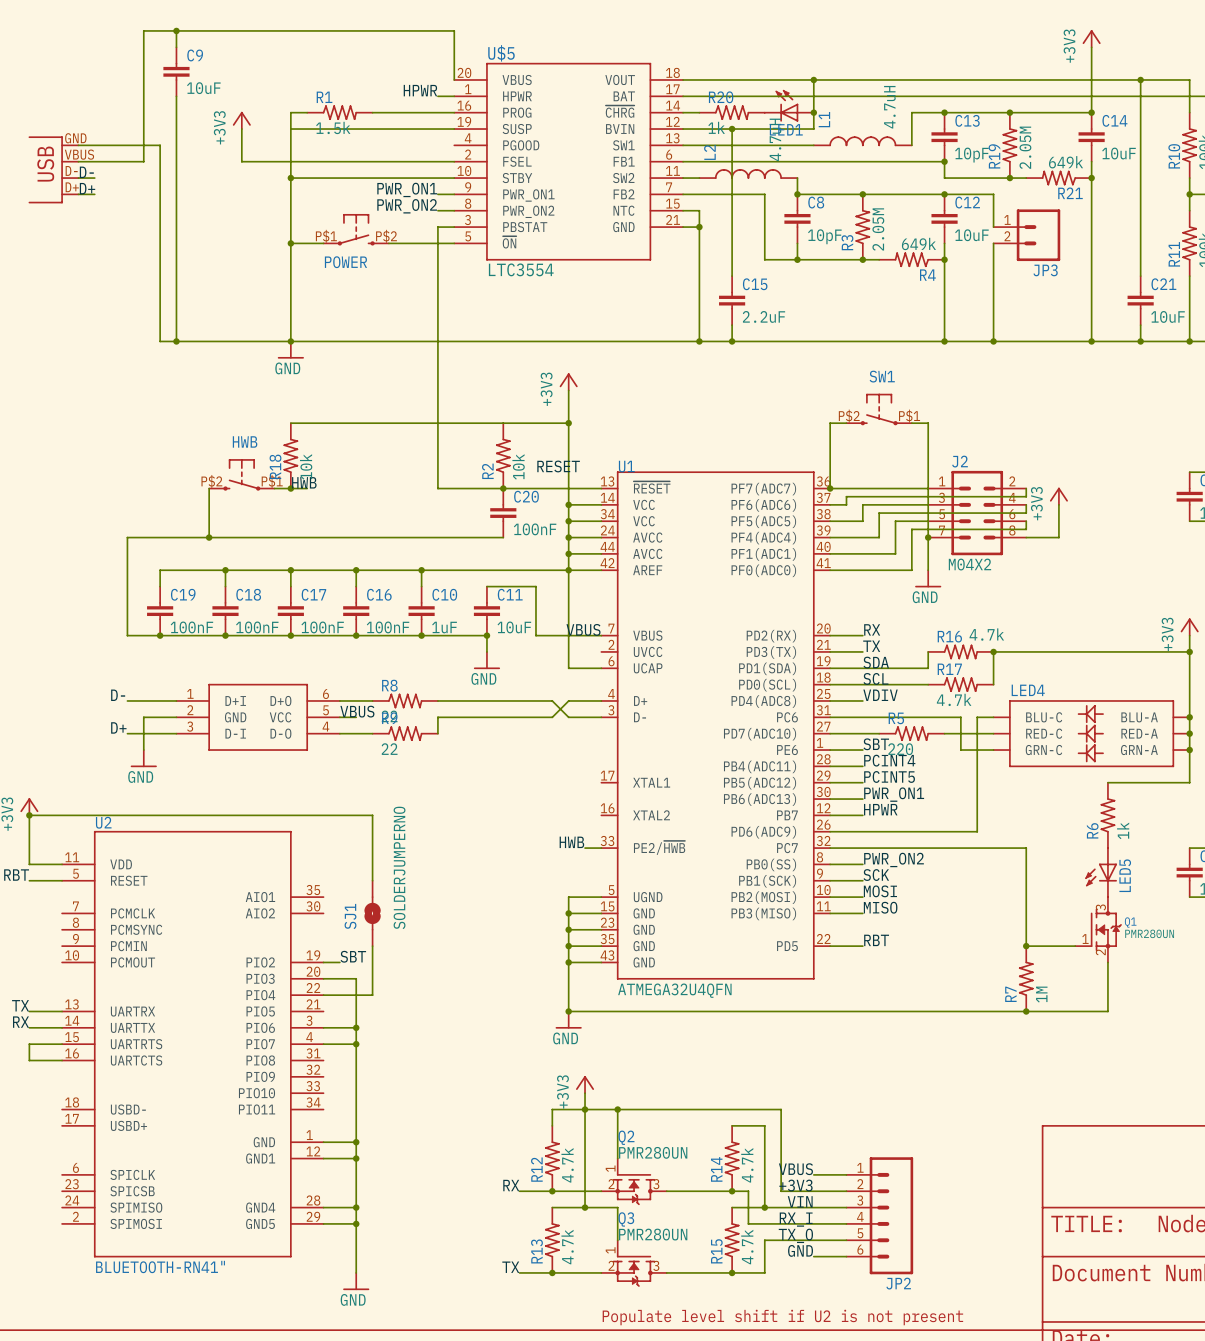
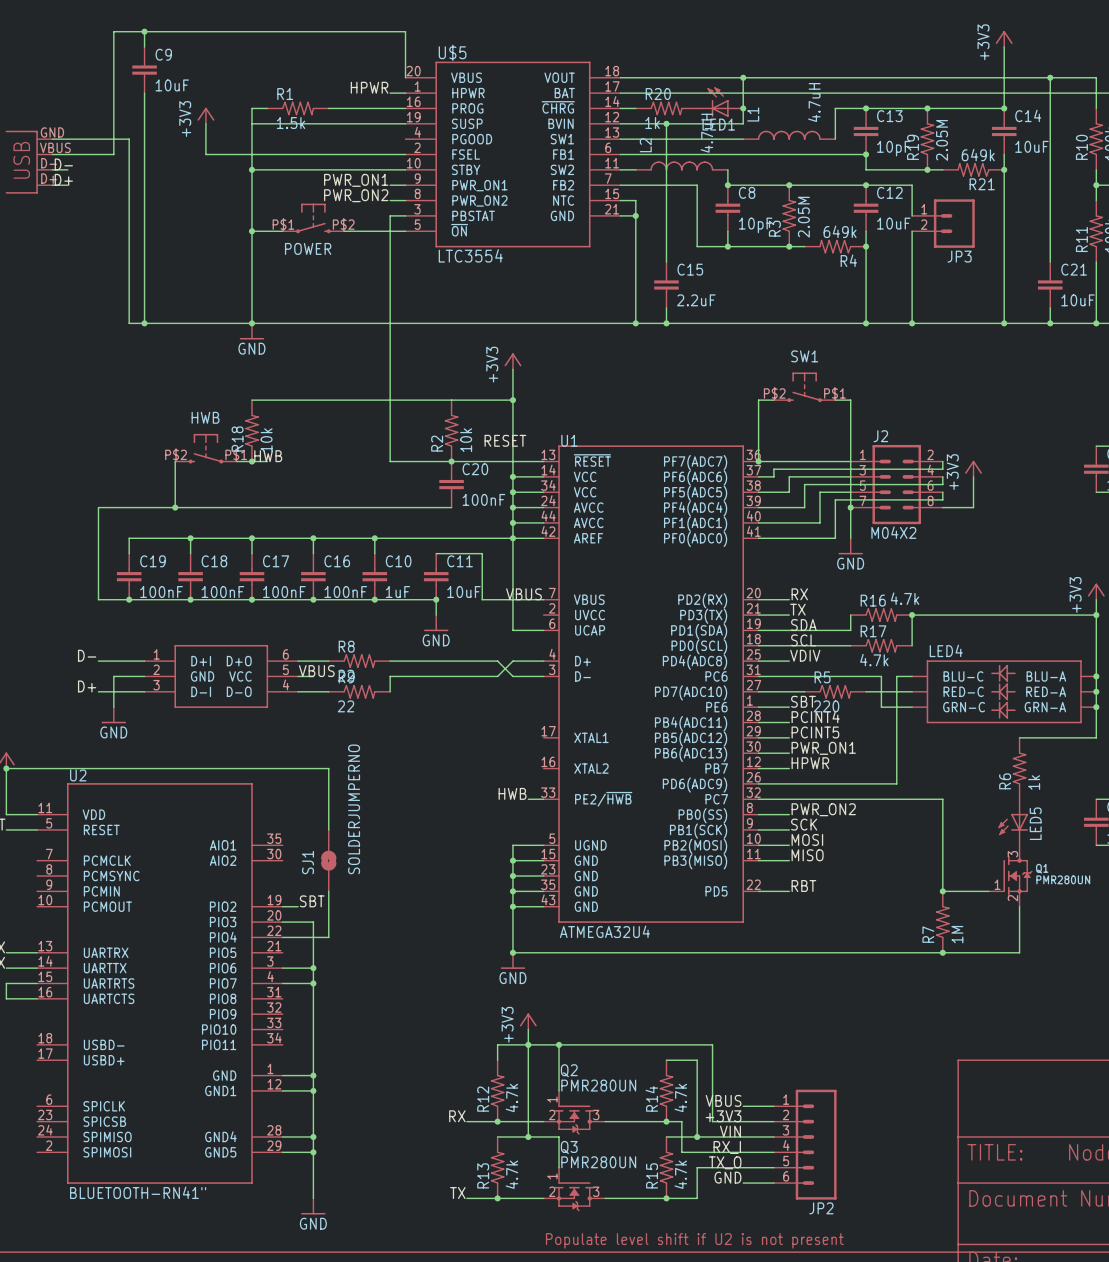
U1 value: ATMEGA32U4QFN (674, 990) -> ATMEGA32U4 (604, 931)

